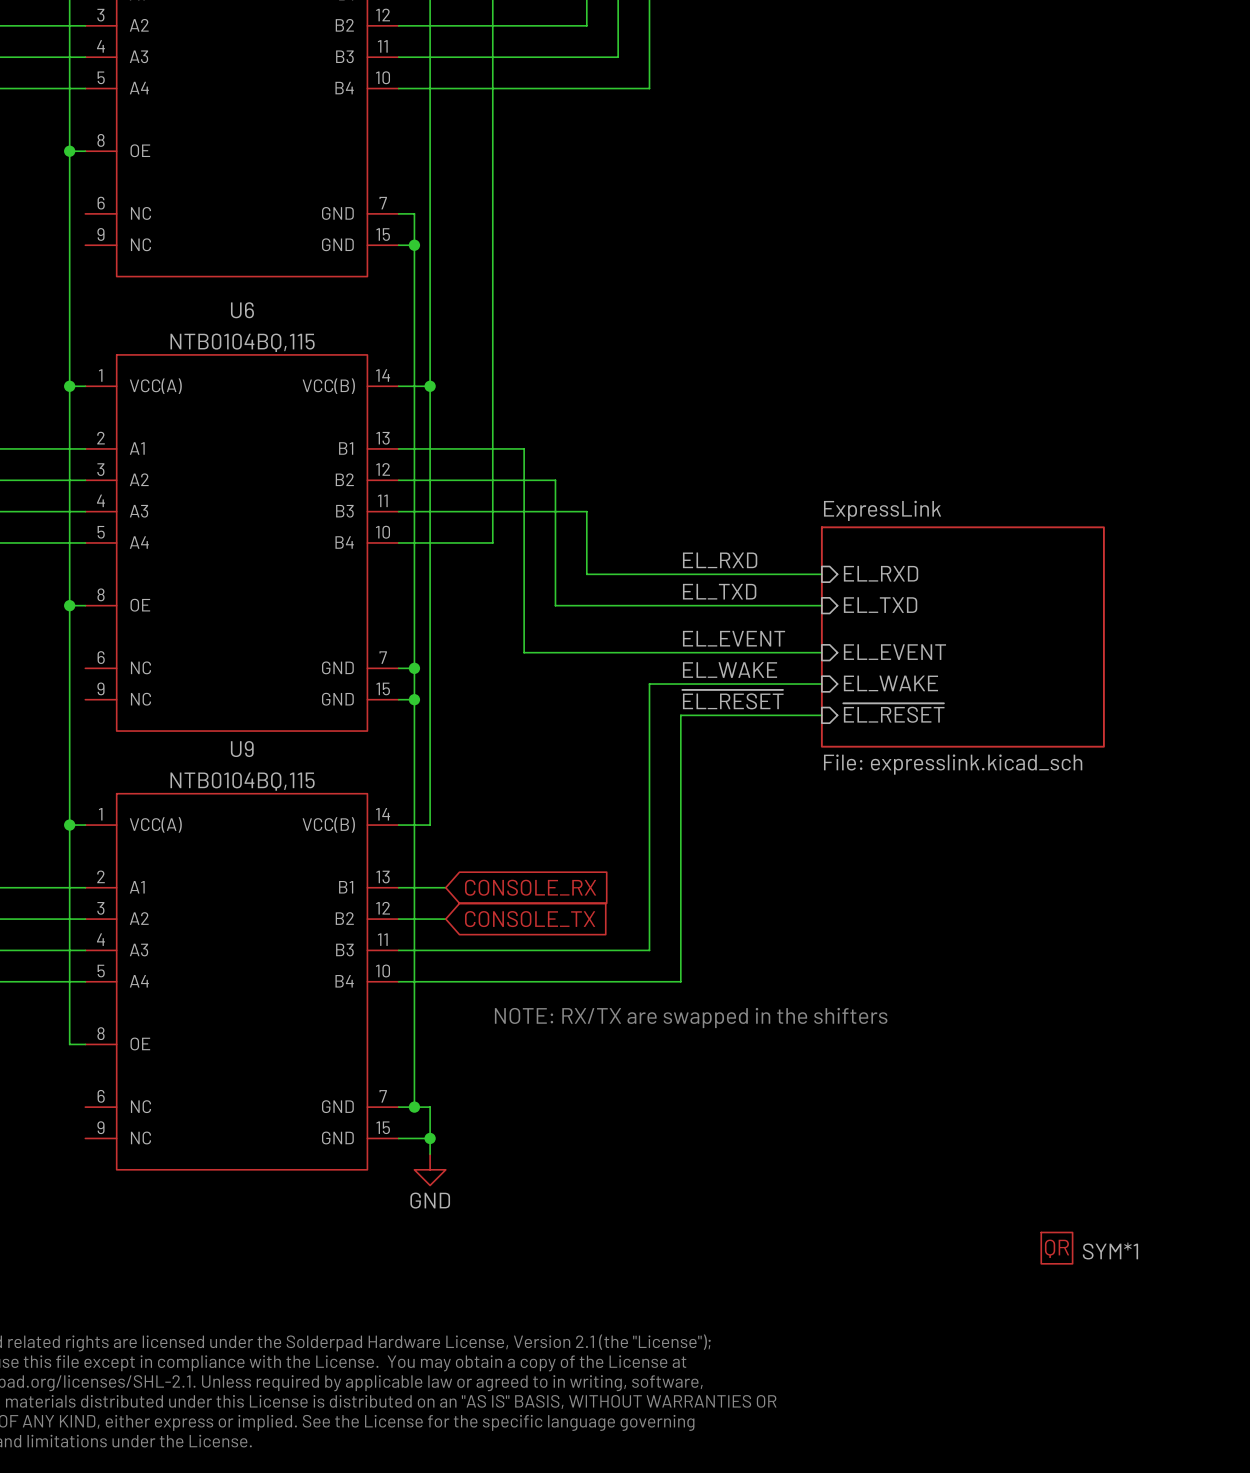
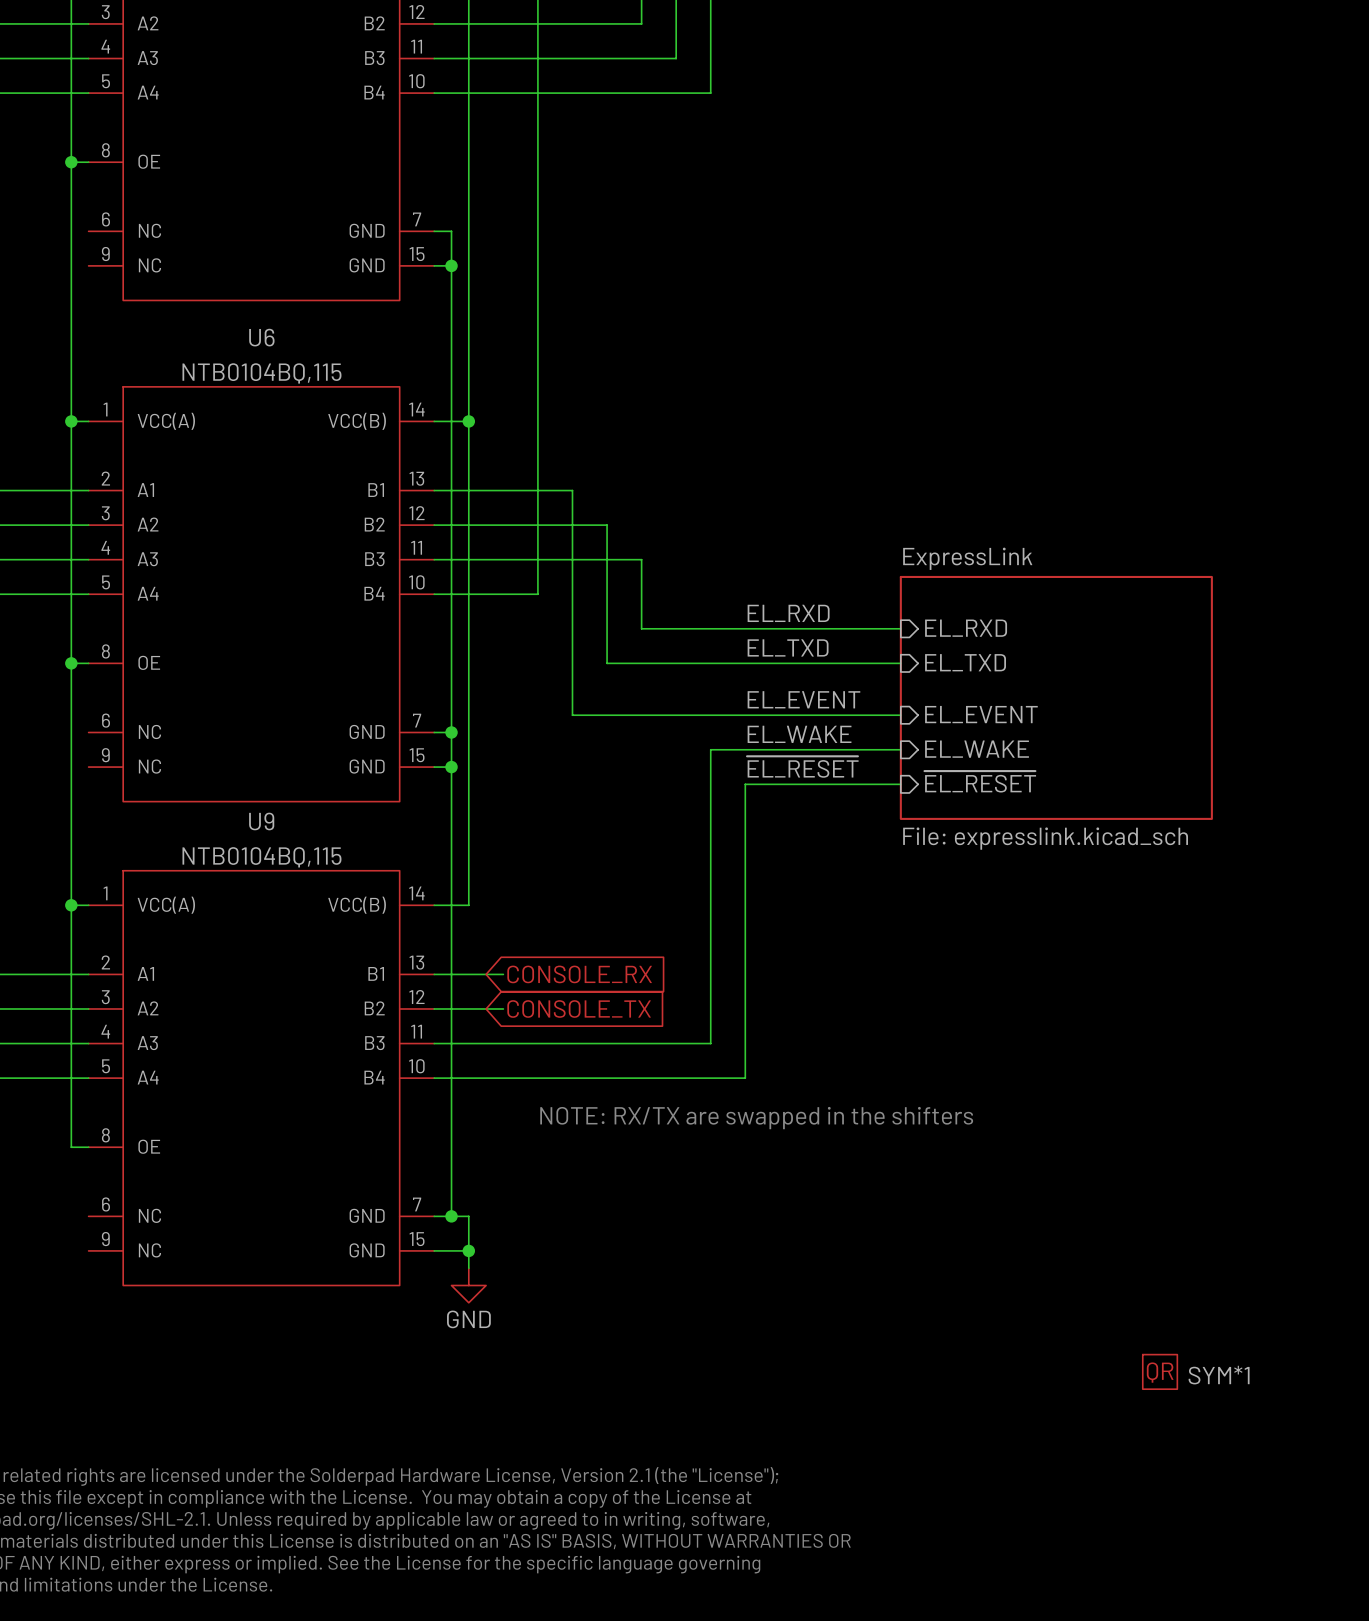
wire: none -> (486, 974) (503, 974)
wire: none -> (486, 1008) (503, 1008)

